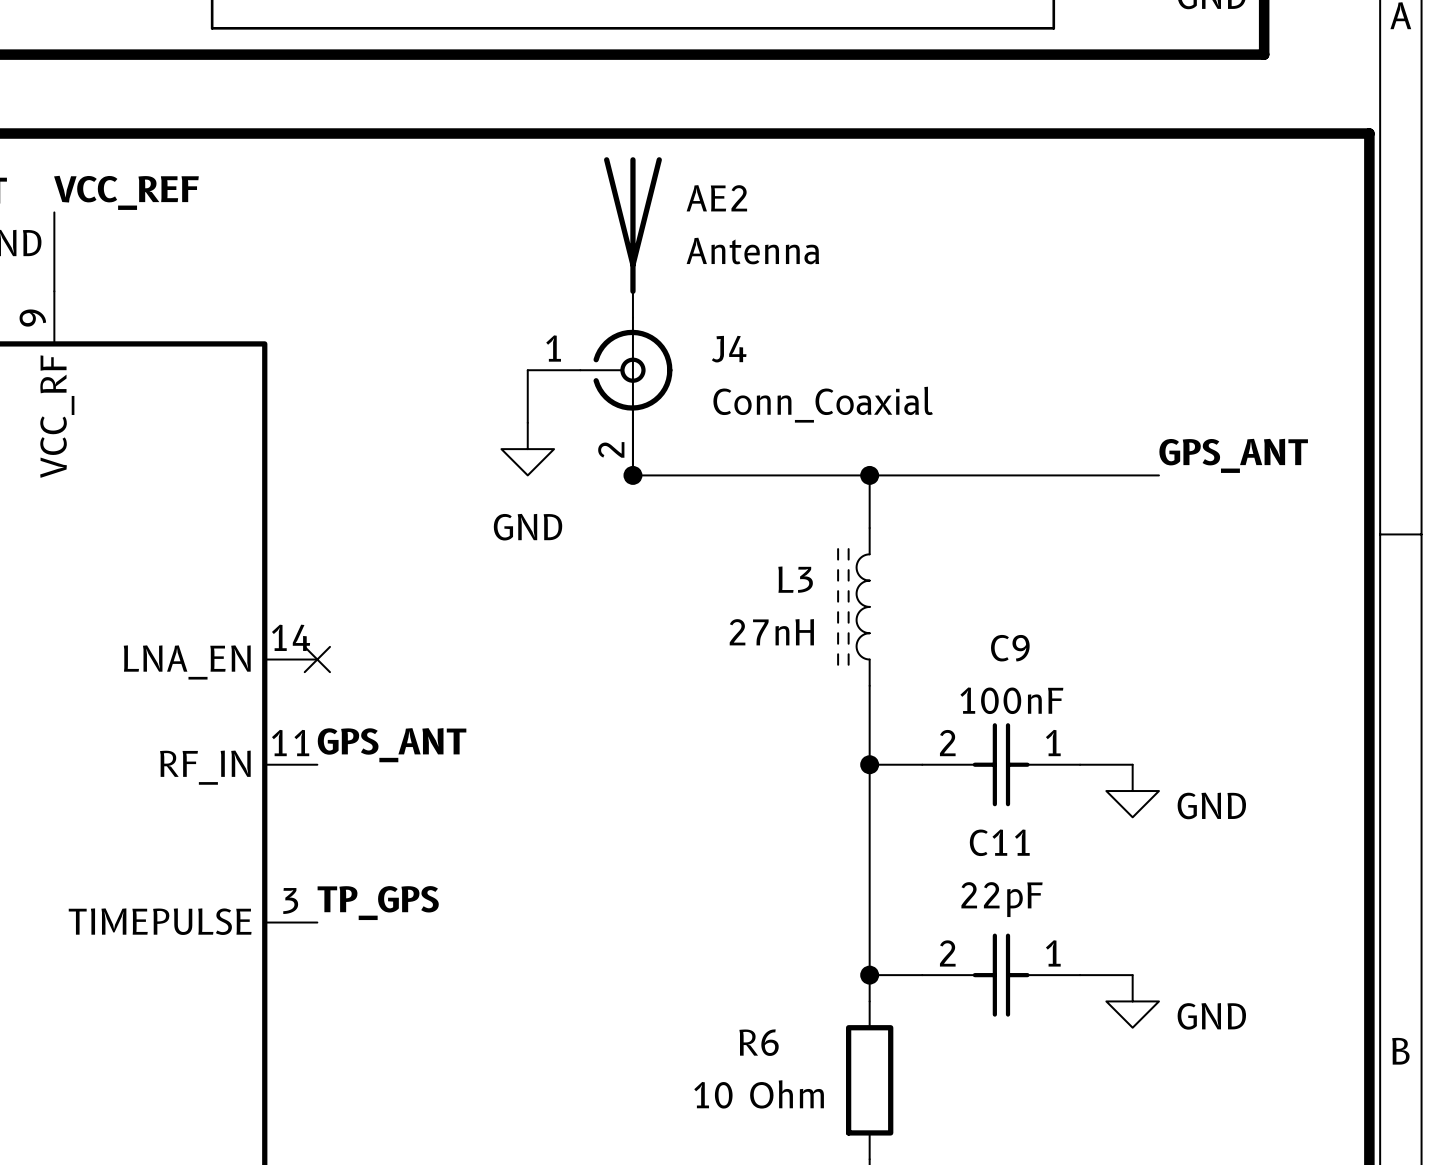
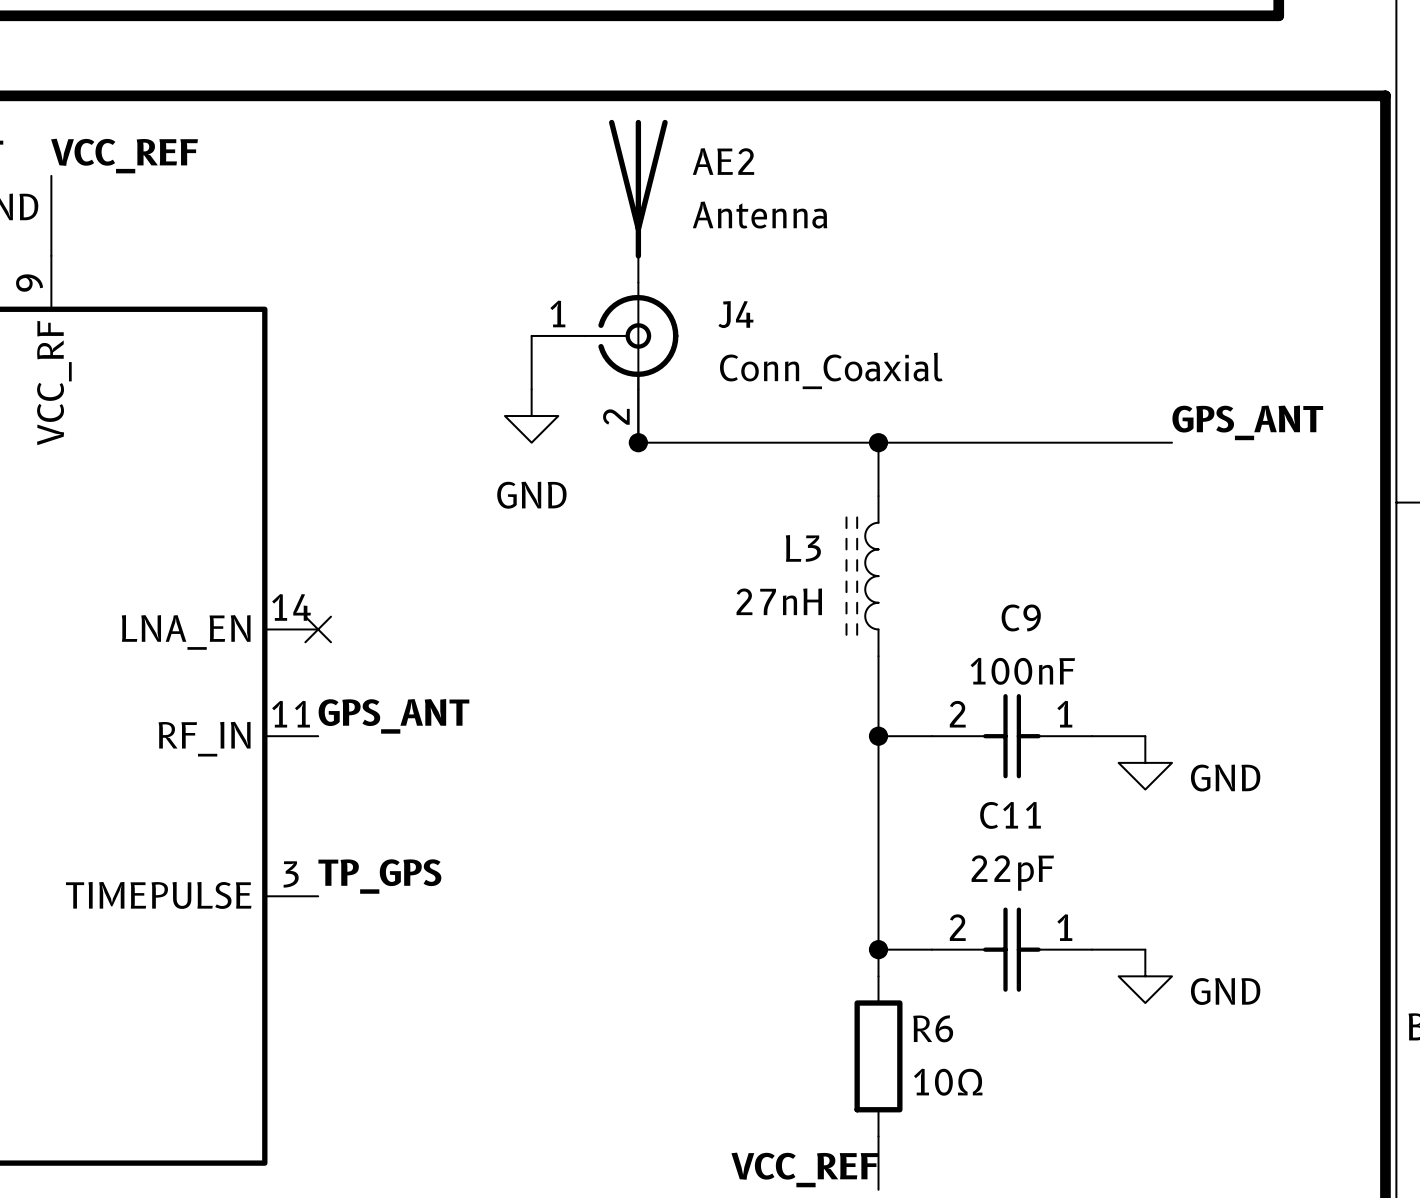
R6 name position: R6 (759, 1042) -> R6 (933, 1028)
R6 value: 10 Ohm (759, 1094) -> 10Ω (948, 1082)

